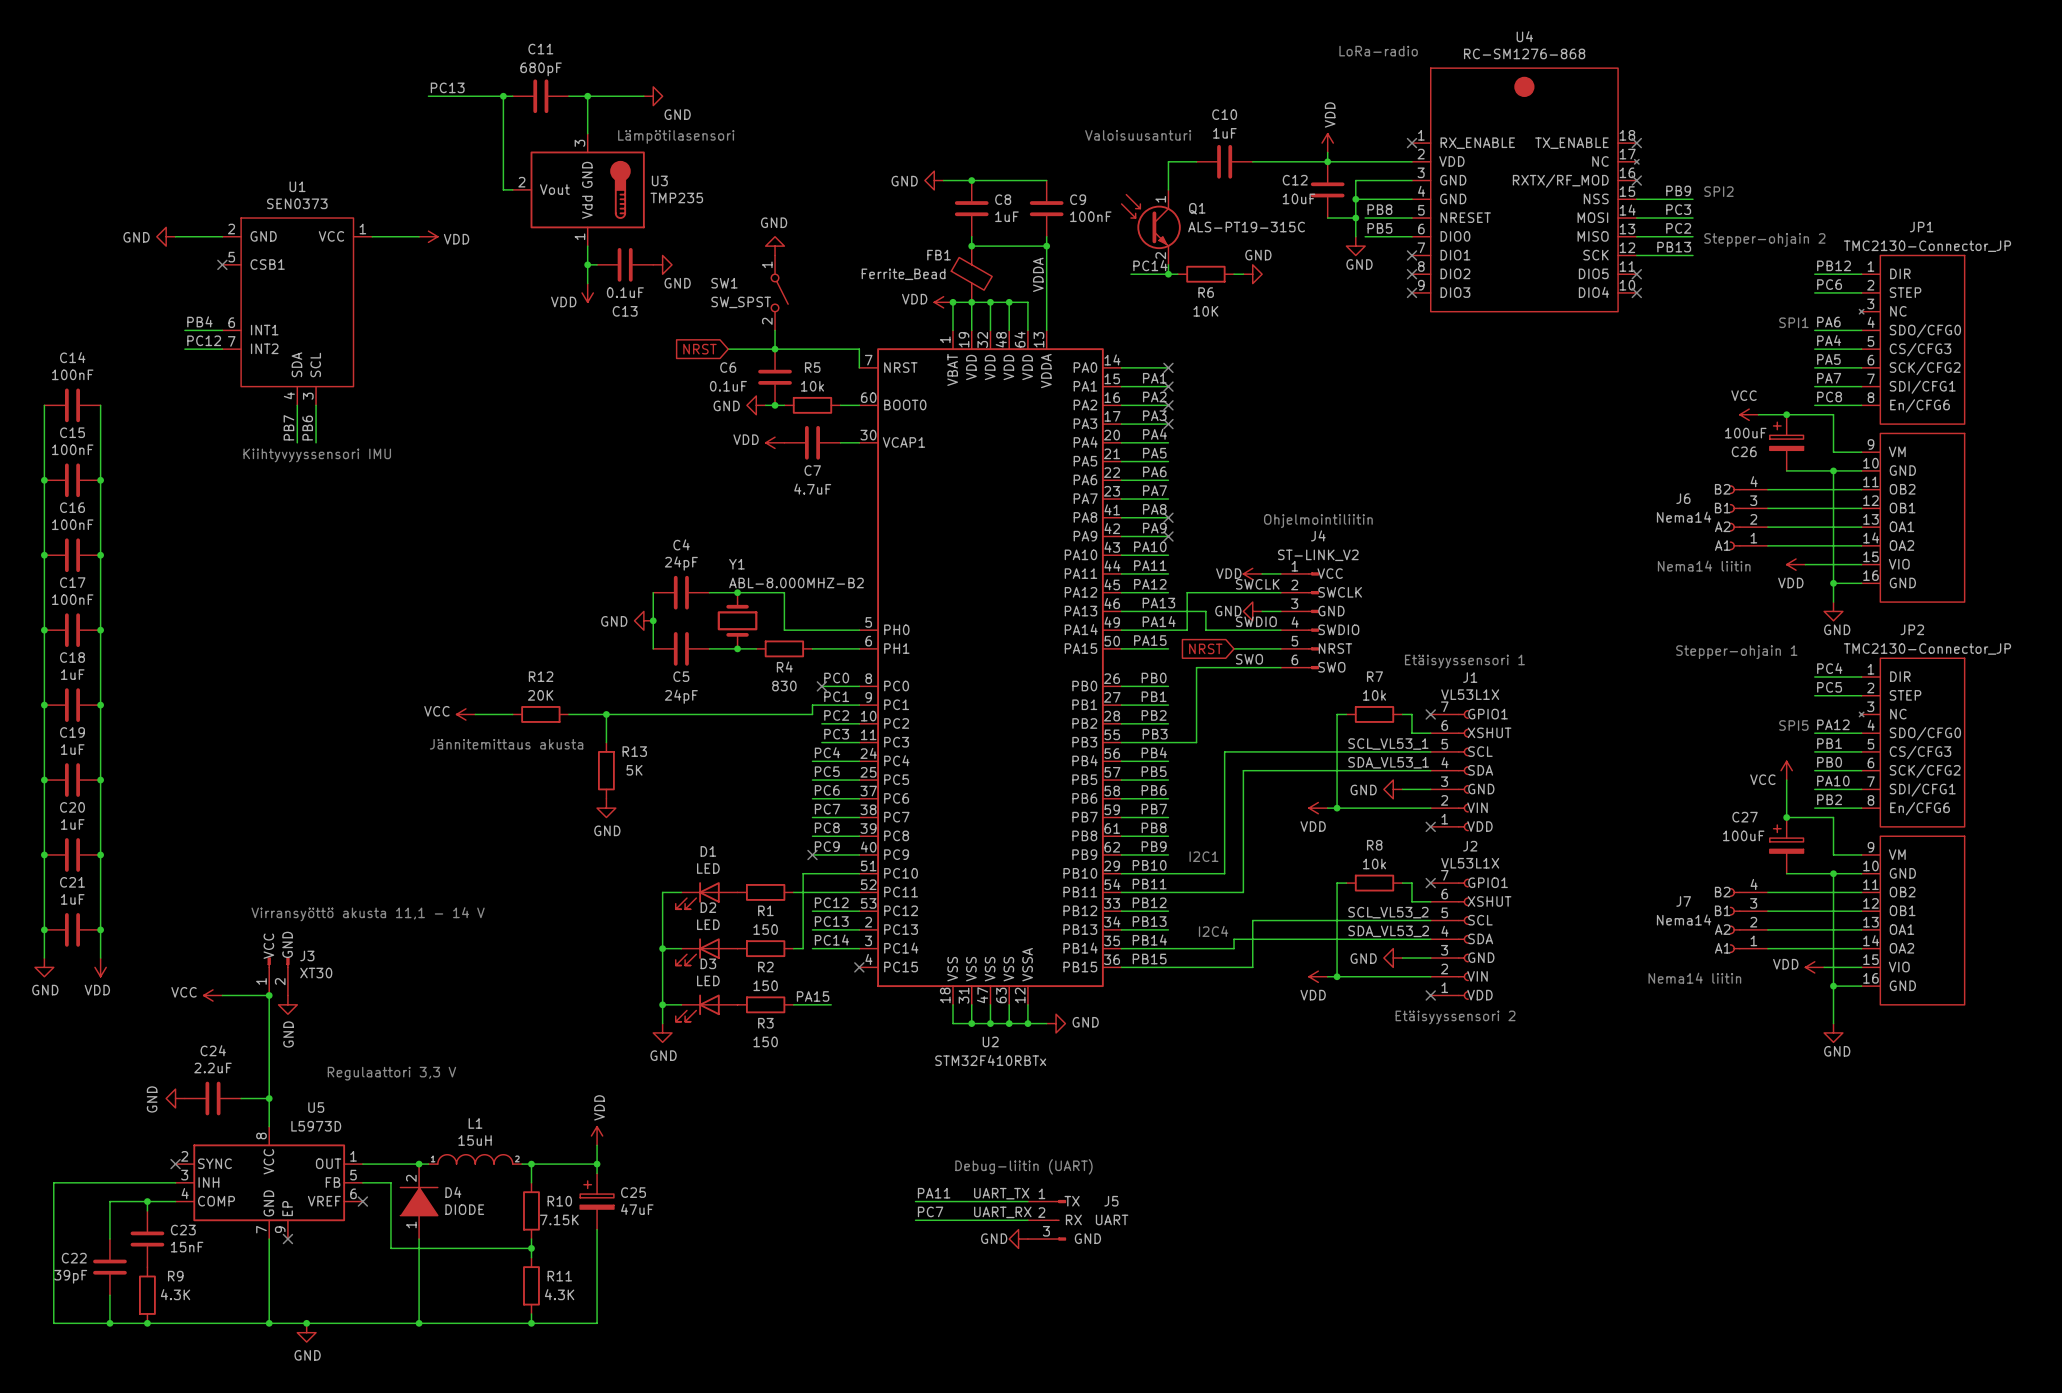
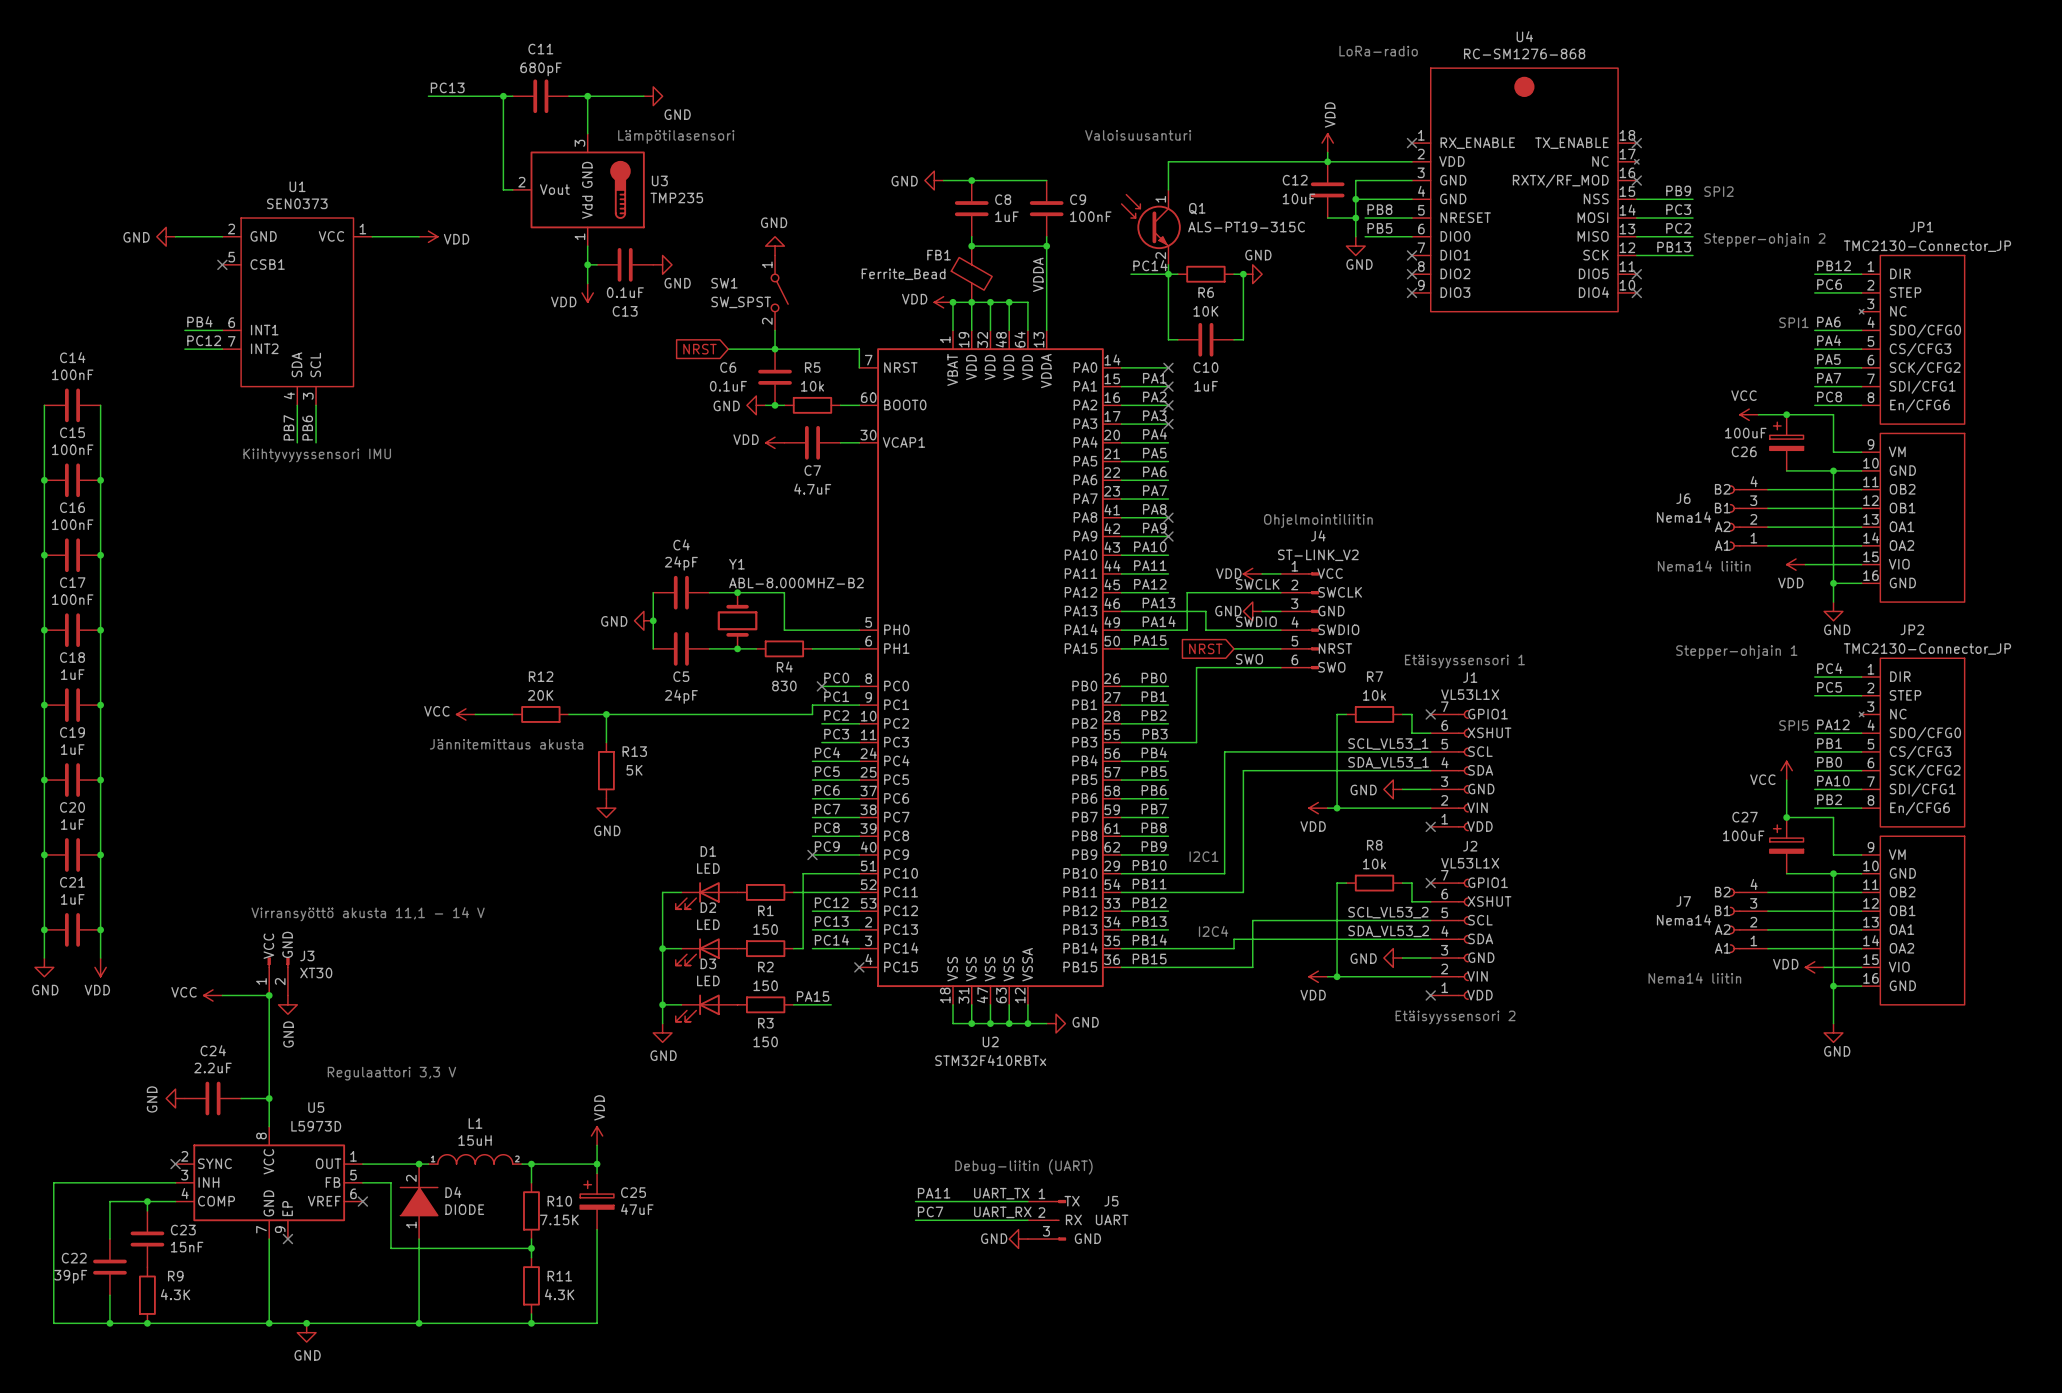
C10 name position: C10 (1224, 114) -> C10 (1205, 367)
C10 value position: 1uF (1224, 133) -> 1uF (1206, 386)
C10 position: (1224, 161) -> (1205, 339)
wire: none -> (1168, 274) (1168, 339) (1177, 339)
wire: none -> (1243, 274) (1243, 339) (1234, 339)
junction: none -> (1243, 274)

